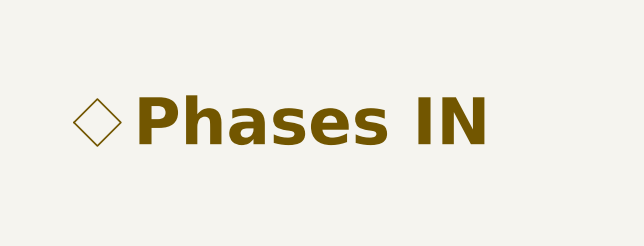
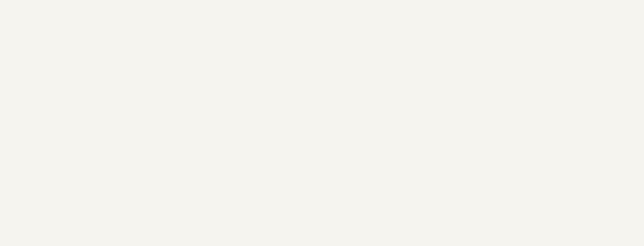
hierarchical label: Phases IN (311, 120) -> none

